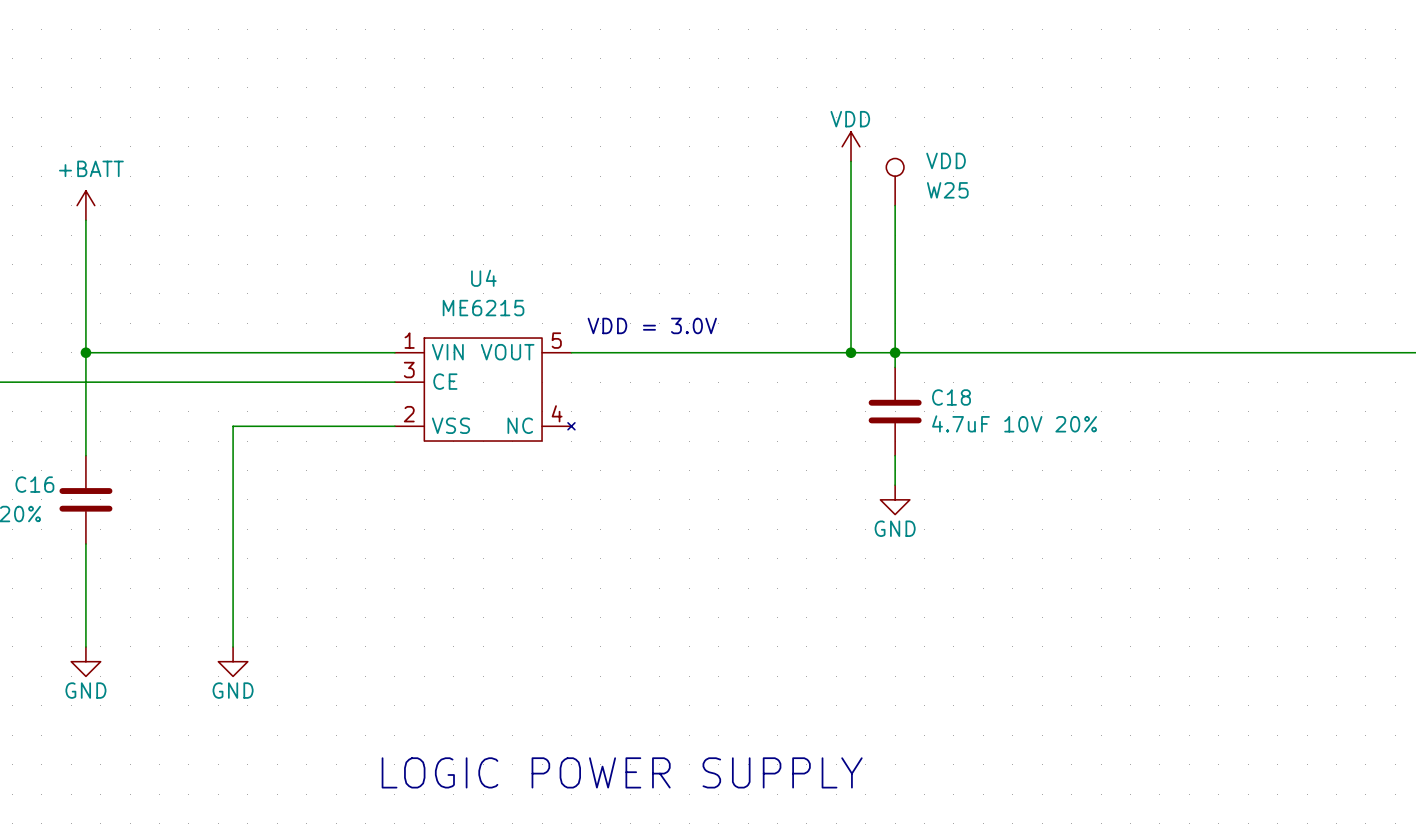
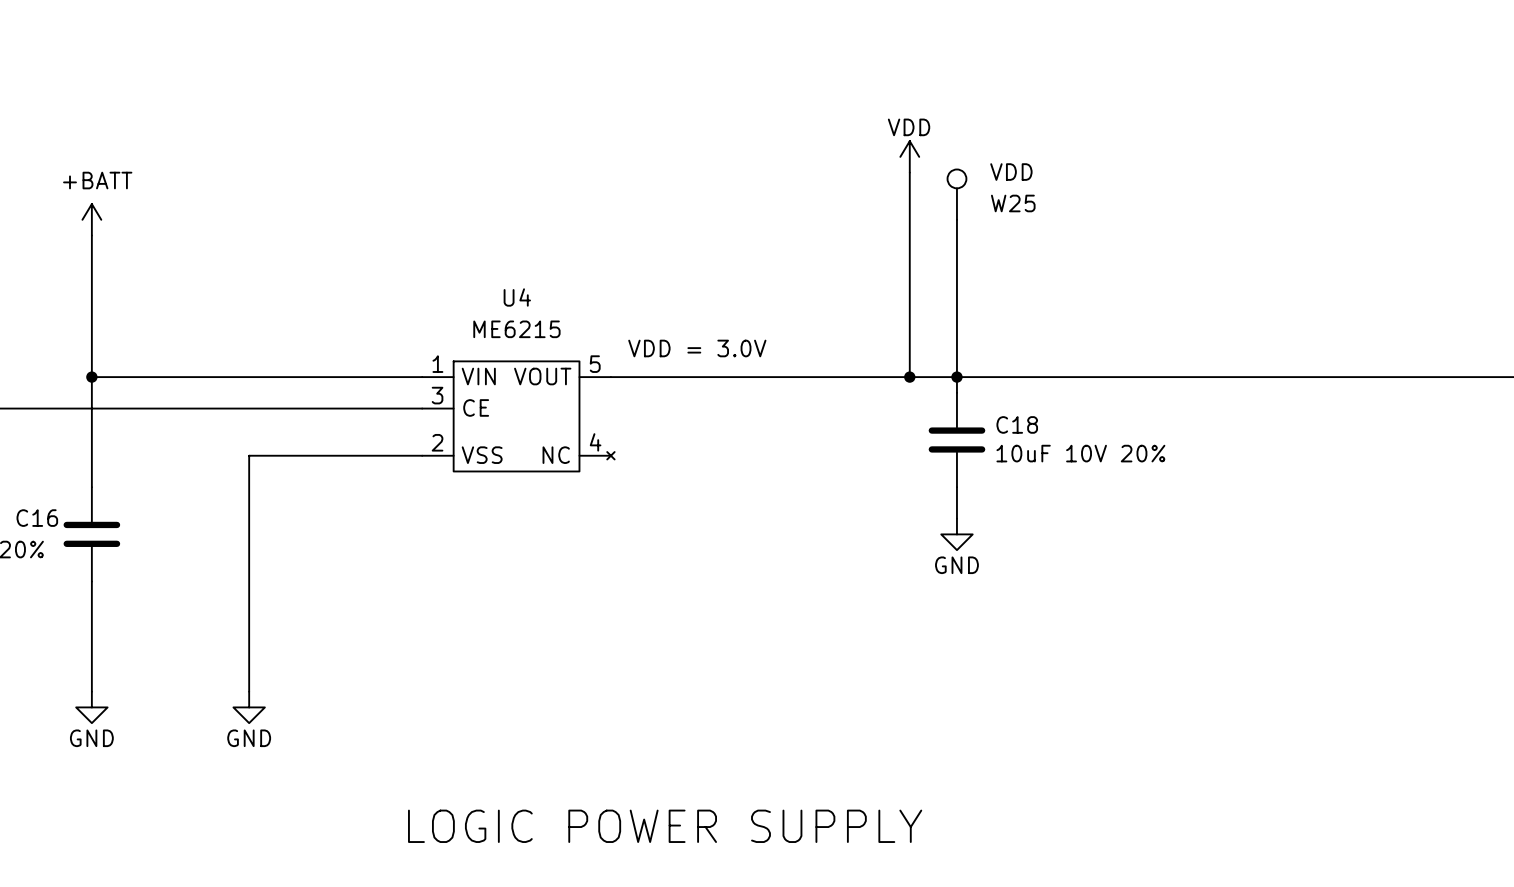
C18 value: 4.7uF 10V 20% (1014, 423) -> 10uF 10V 20% (1080, 453)

